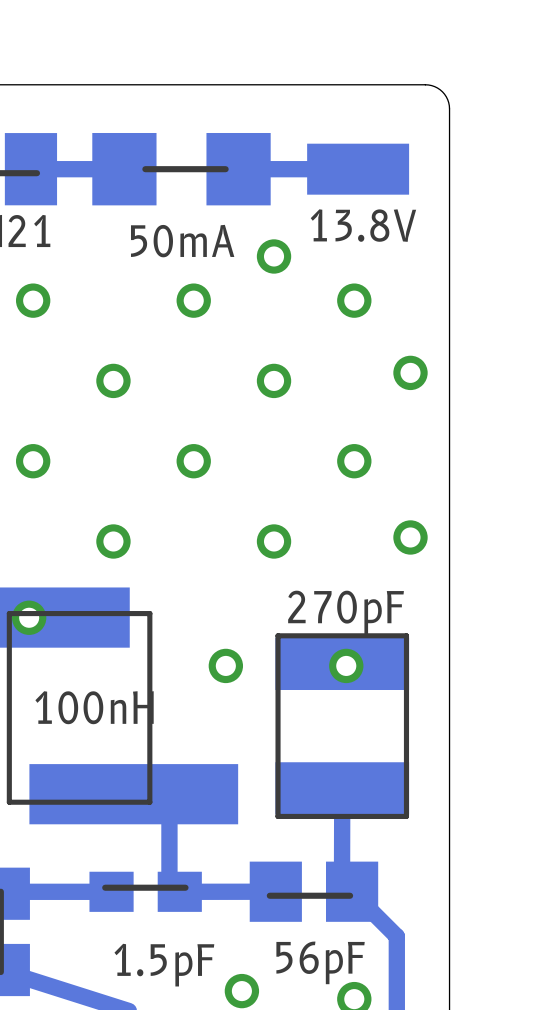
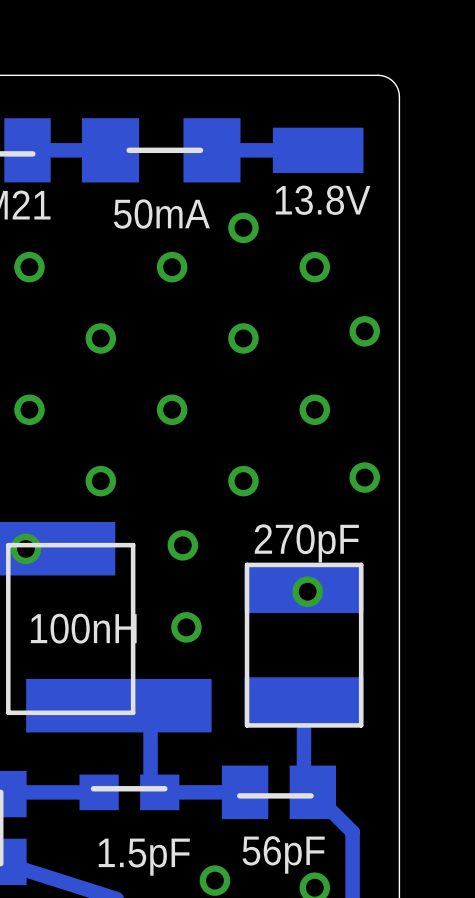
via: none -> (182, 545)
via: (225, 665) -> none
via: none -> (186, 627)

